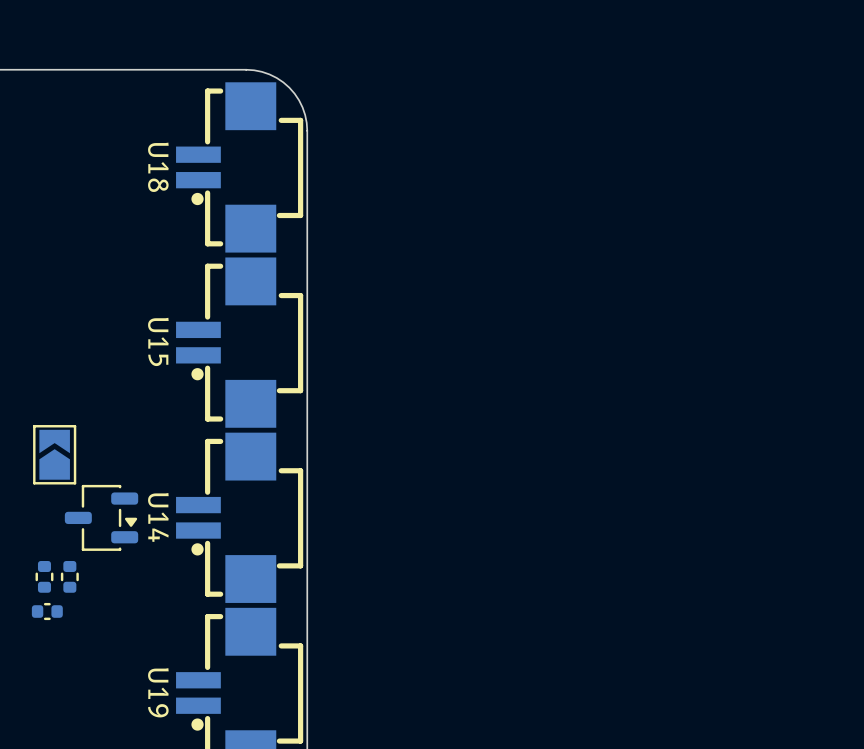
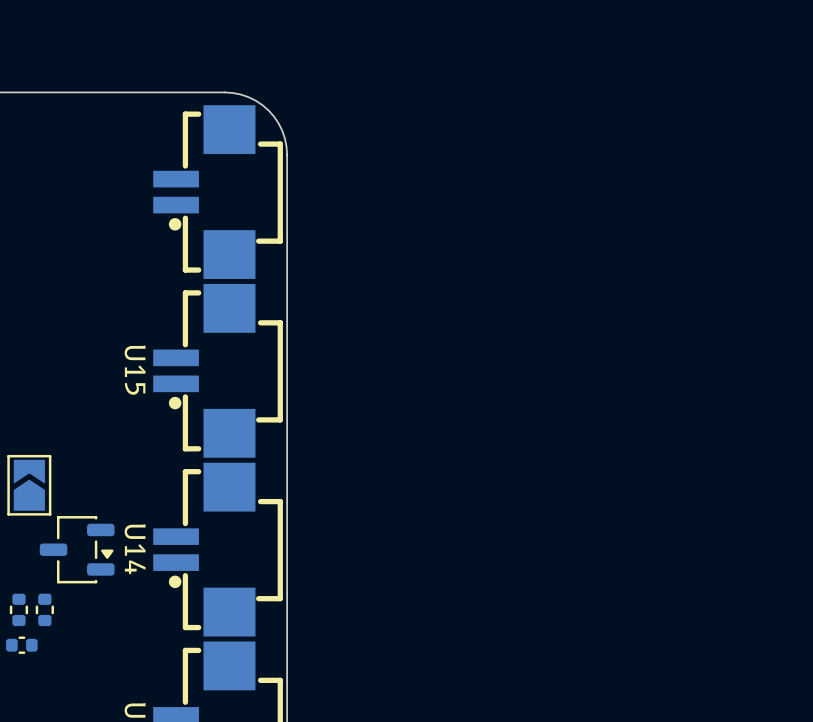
U18 name: U18 (158, 167) -> none

